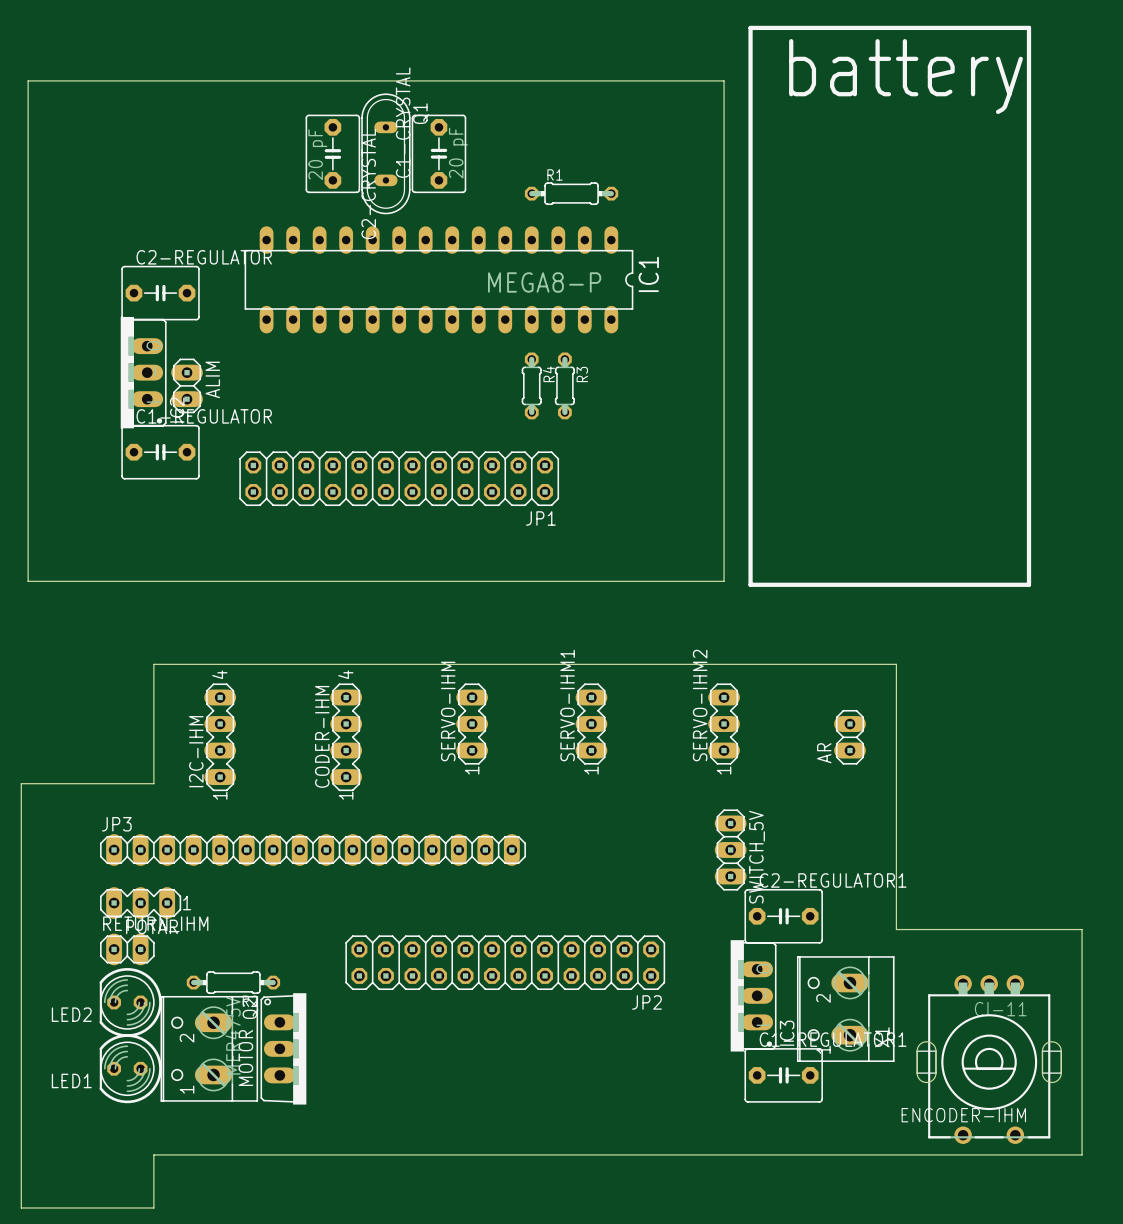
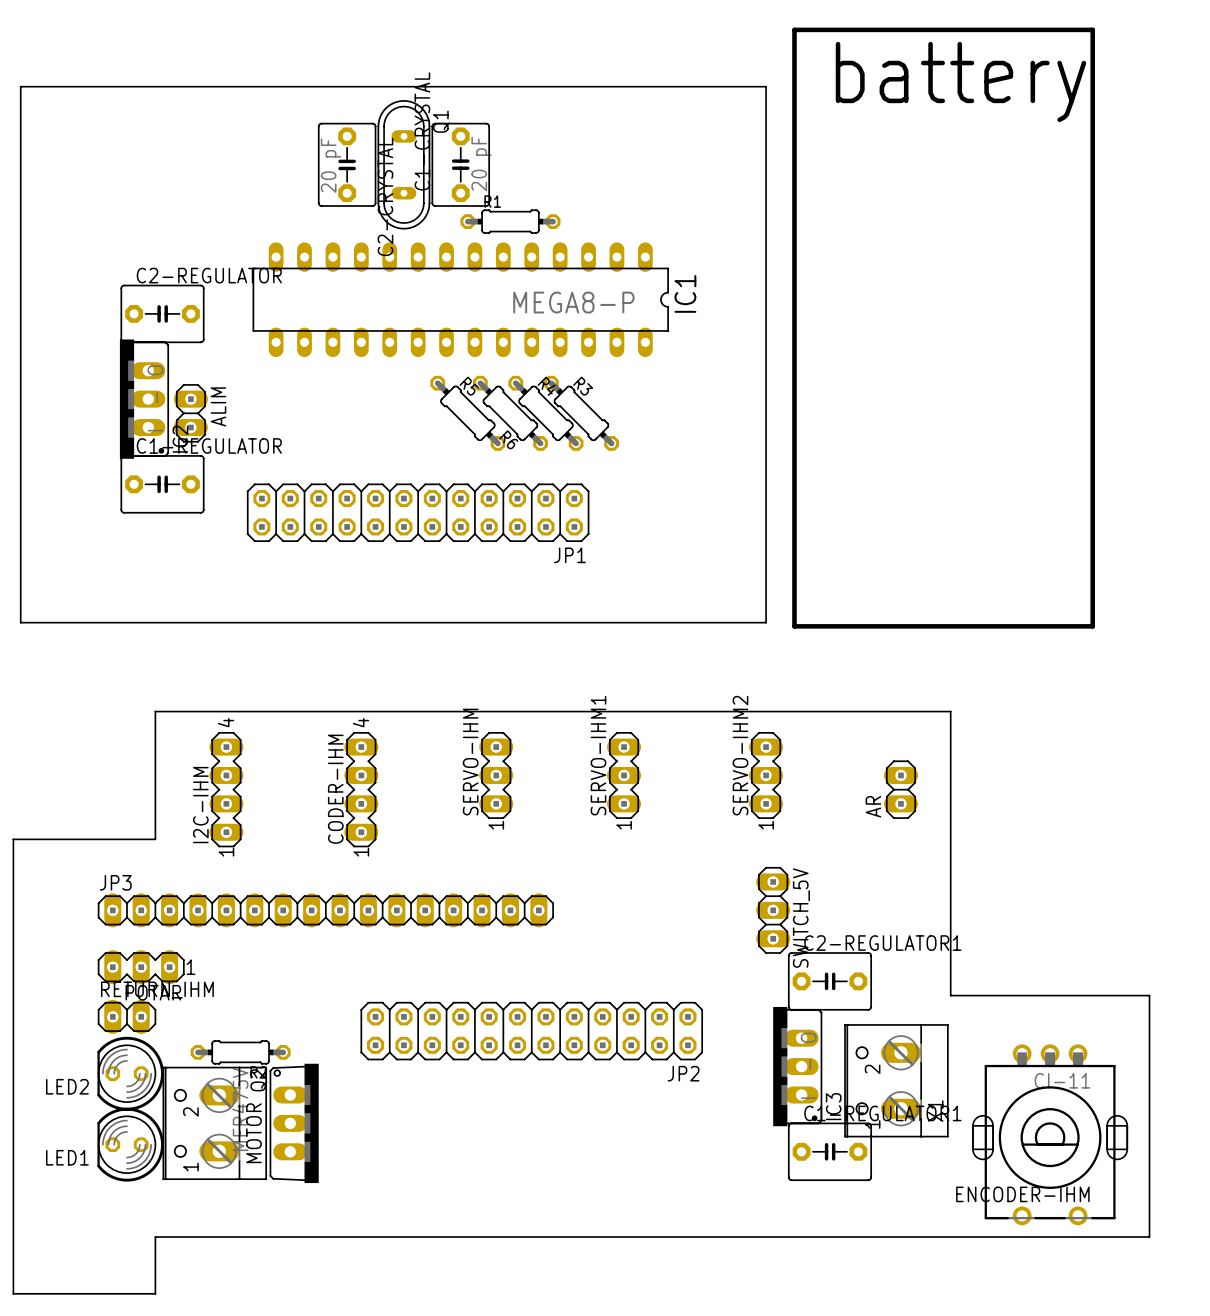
R1 position: (571, 193) -> (510, 221)
R4 footprint: [521, 352, 542, 420] -> [508, 375, 584, 451]
R3 footprint: [554, 352, 576, 420] -> [543, 375, 619, 451]
R4 name position: R4 (548, 374) -> R4 (546, 386)
R3 name position: R3 (582, 374) -> R3 (583, 386)
R5: none -> (467, 413)
R6: none -> (510, 413)

